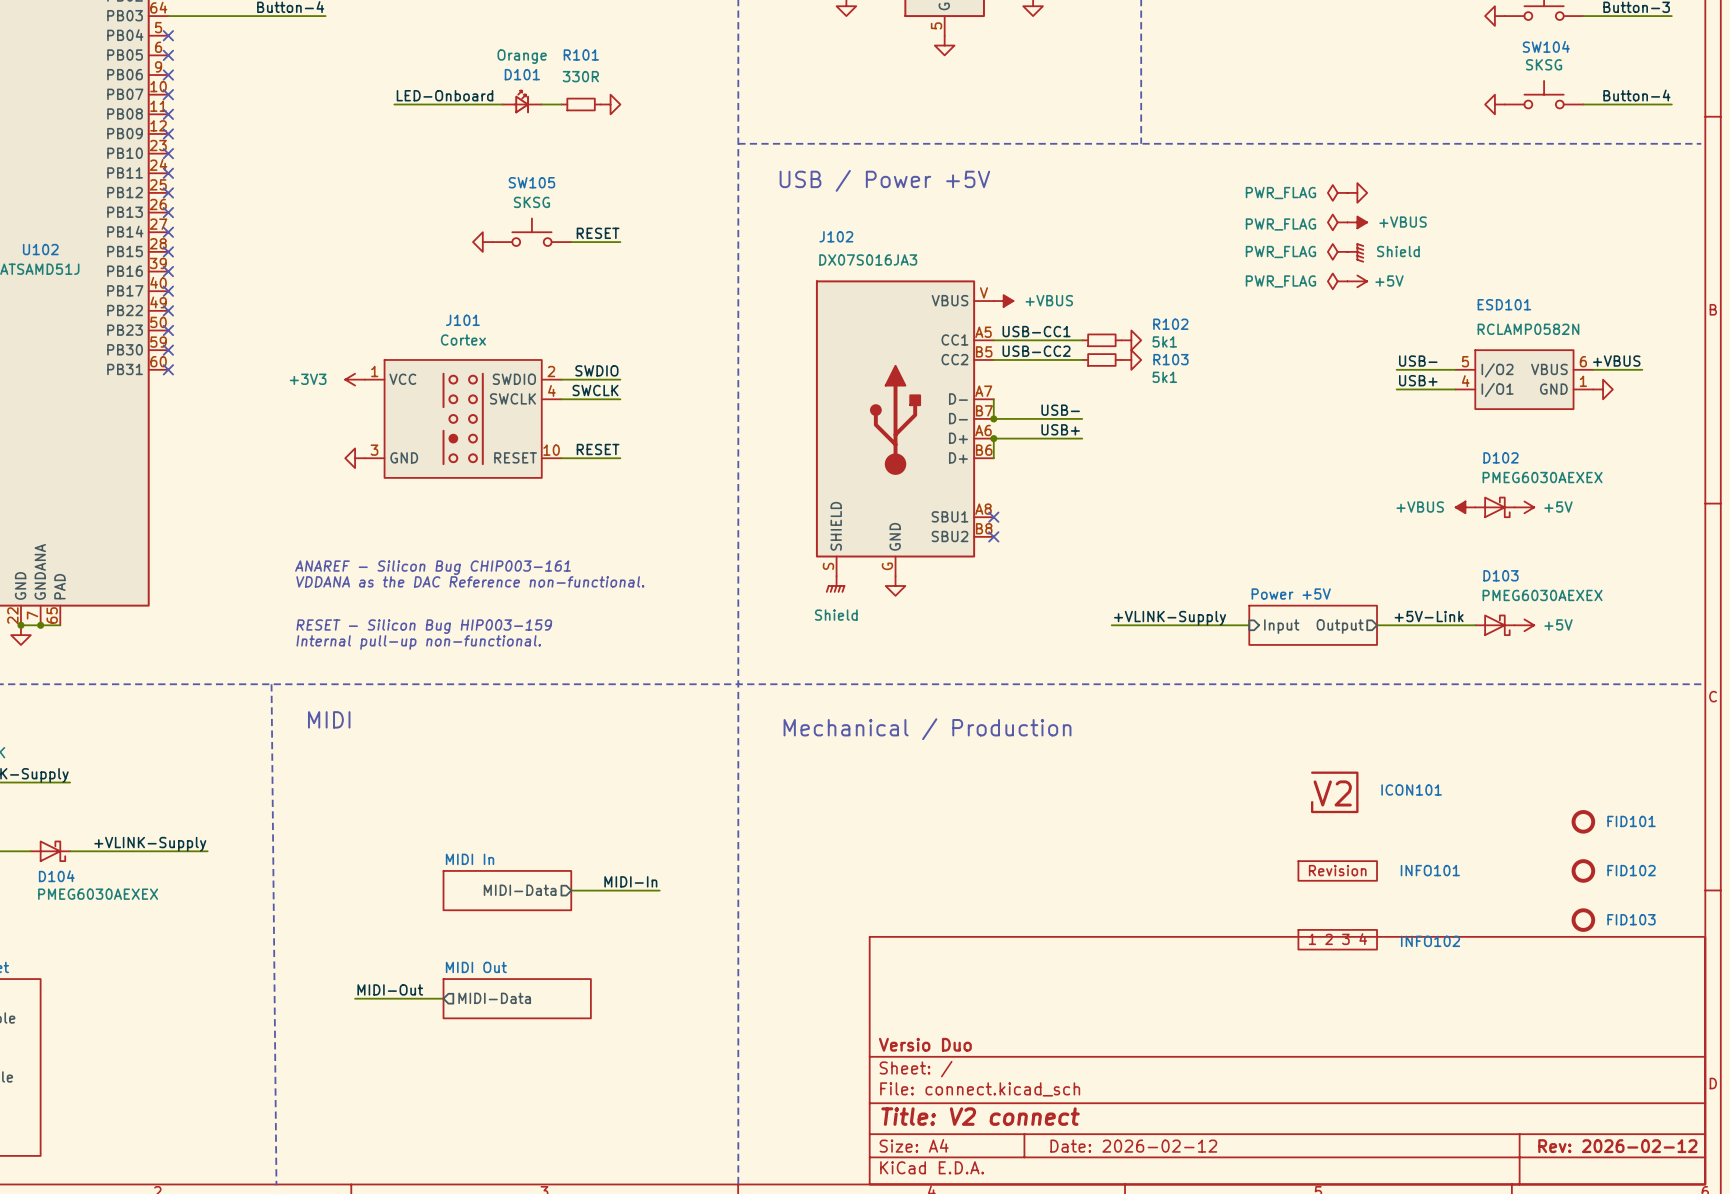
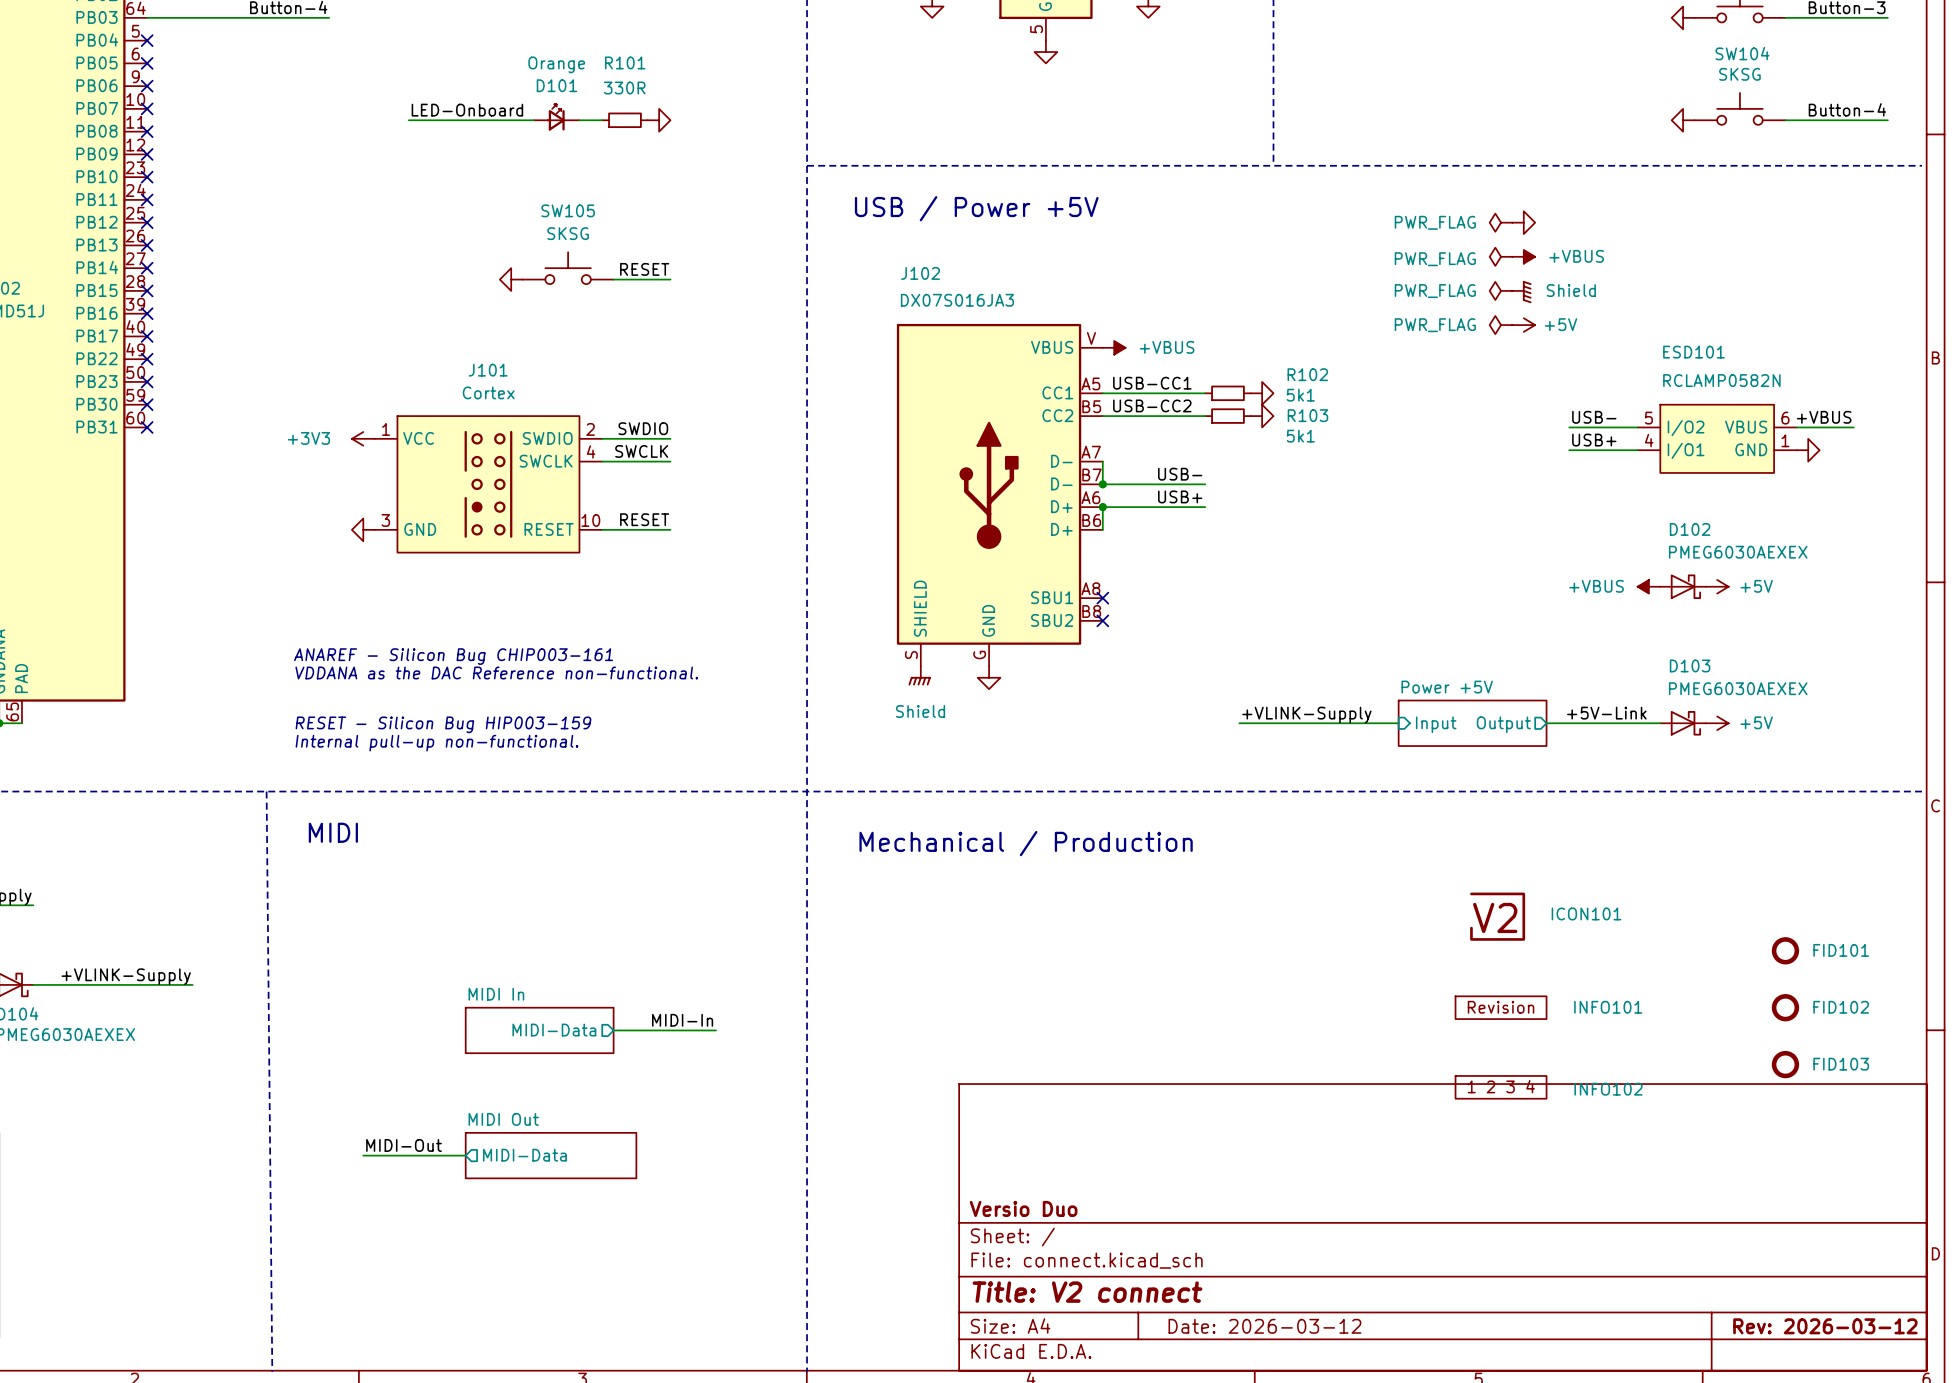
title block: Date: 2026-02-12 (1133, 1146) -> Date: 2026-03-12 (1264, 1326)
title block: Rev: 2026-02-12 (1617, 1146) -> Rev: 2026-03-12 (1825, 1326)

